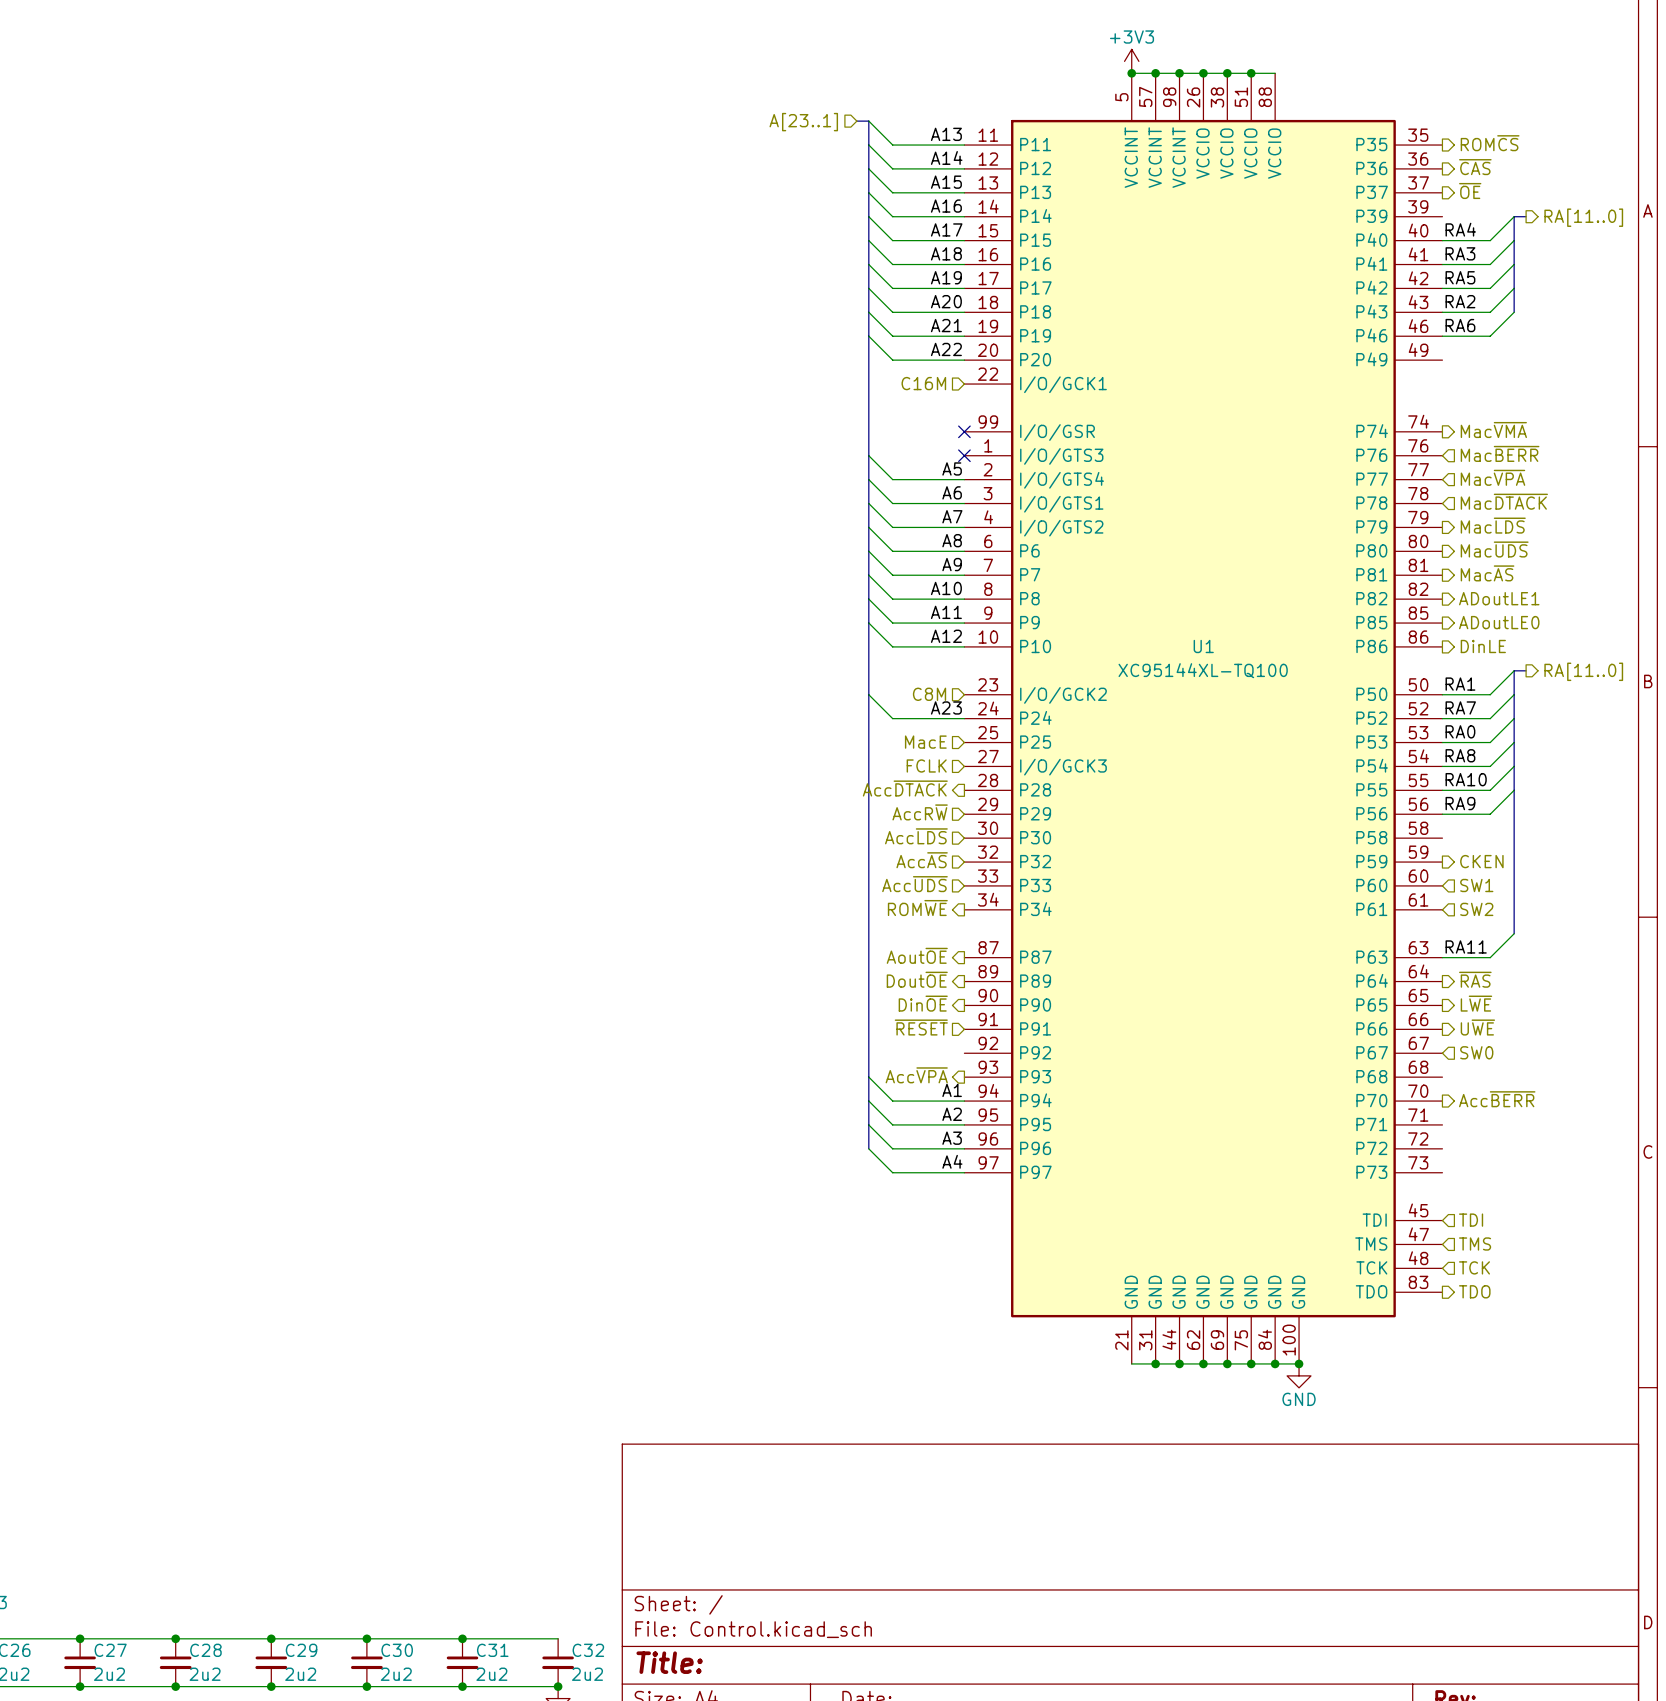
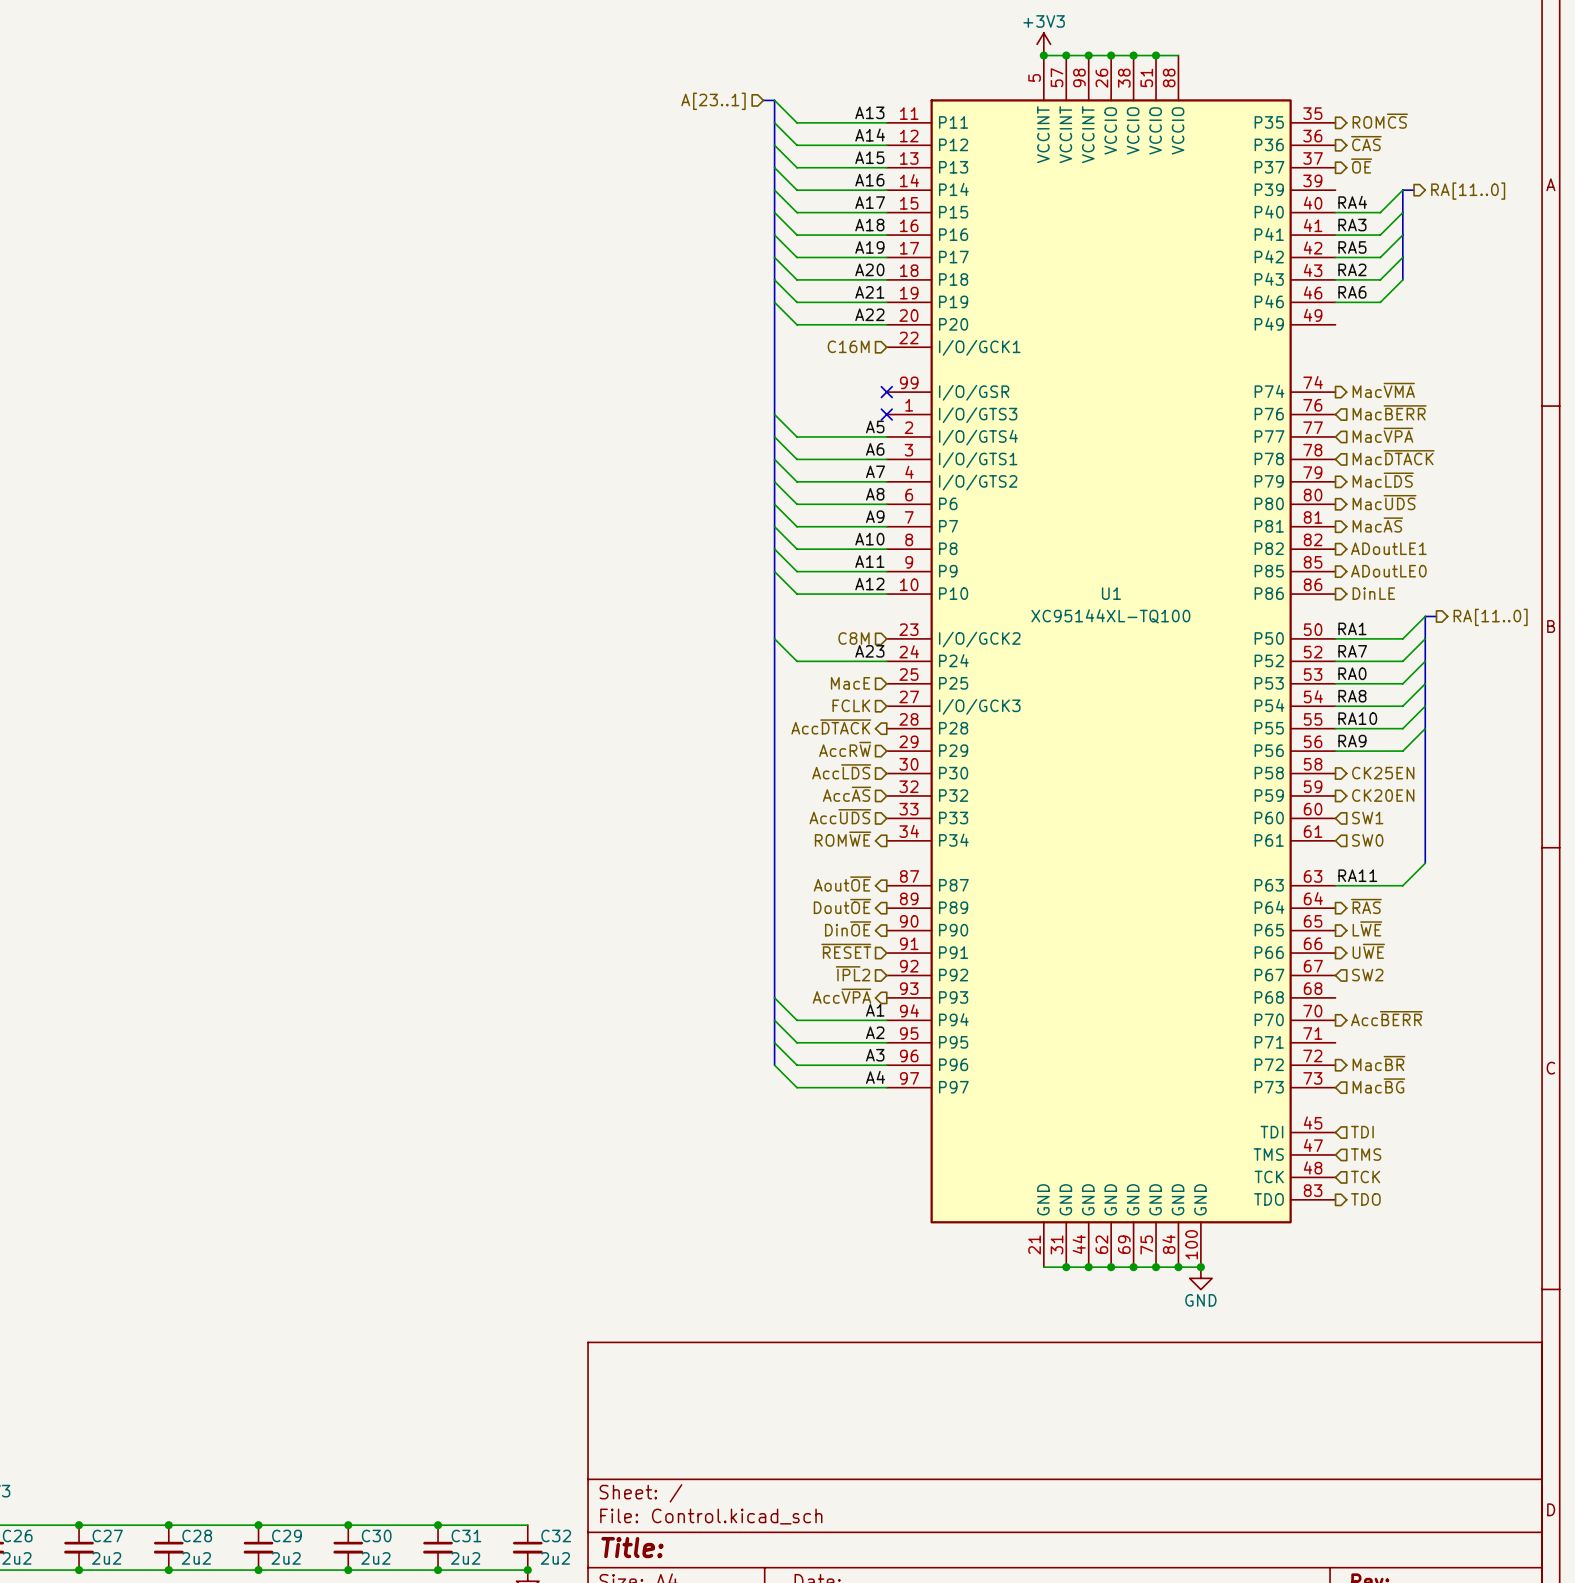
power symbol position: +3V3 (1131, 61) -> +3V3 (1043, 44)
junction: none -> (1043, 55)
wire: (1251, 73) (1275, 73) -> (1043, 55) (1066, 55)
junction: (1251, 73) -> none
bus: (856, 121) (868, 121) (868, 1148) -> (763, 100) (774, 100) (774, 1065)
wire: (868, 121) (892, 145) -> (774, 100) (797, 122) (841, 122)
hierarchical label position: A[23..1] (803, 122) -> A[23..1] (713, 101)
label position: A13 (946, 134) -> A13 (869, 112)
hierarchical label position: ROM~{CS} (1490, 143) -> ROM~{CS} (1380, 121)
wire: (868, 145) (892, 168) -> (774, 122) (797, 145) (841, 145)
label position: A14 (946, 157) -> A14 (870, 135)
hierarchical label position: ~{CAS} (1475, 167) -> ~{CAS} (1366, 143)
wire: (868, 168) (892, 192) -> (774, 145) (797, 167) (841, 167)
label position: A15 (946, 182) -> A15 (869, 157)
hierarchical label position: ~{OE} (1470, 191) -> ~{OE} (1361, 166)
wire: (868, 192) (892, 216) -> (774, 167) (797, 190) (841, 190)
label position: A16 (946, 206) -> A16 (869, 180)
wire: (868, 216) (892, 240) -> (774, 190) (797, 212) (841, 212)
wire: (1514, 216) (1490, 240) (1466, 240) -> (1402, 190) (1380, 212)
bus: (1526, 216) (1514, 216) (1514, 312) -> (1414, 190) (1402, 190) (1402, 279)
hierarchical label position: RA[11..0] (1583, 217) -> RA[11..0] (1468, 191)
label position: A17 (946, 229) -> A17 (870, 202)
label position: RA4 (1460, 229) -> RA4 (1352, 202)
wire: (868, 240) (892, 264) -> (774, 212) (797, 235) (841, 235)
wire: (1514, 240) (1490, 264) (1466, 264) -> (1402, 212) (1380, 235)
label position: A18 (946, 253) -> A18 (869, 225)
label position: RA3 (1460, 253) -> RA3 (1352, 225)
wire: (868, 264) (892, 288) -> (774, 235) (797, 257) (841, 257)
wire: (1514, 264) (1490, 288) (1466, 288) -> (1402, 235) (1380, 257)
label position: A19 (946, 277) -> A19 (869, 247)
label position: RA5 (1460, 277) -> RA5 (1352, 247)
wire: (868, 288) (892, 312) -> (774, 257) (797, 279) (841, 279)
wire: (1514, 288) (1490, 312) (1466, 312) -> (1402, 257) (1380, 279)
label position: A20 (946, 301) -> A20 (869, 269)
label position: RA2 (1460, 301) -> RA2 (1352, 269)
wire: (868, 312) (892, 336) -> (774, 279) (797, 302) (841, 302)
wire: (1514, 312) (1490, 336) (1466, 336) -> (1402, 279) (1380, 302)
label position: A21 (946, 325) -> A21 (869, 292)
label position: RA6 (1460, 325) -> RA6 (1352, 292)
wire: (868, 336) (892, 360) -> (774, 302) (797, 324) (841, 324)
label position: A22 (946, 349) -> A22 (869, 314)
hierarchical label position: C16M (923, 383) -> C16M (848, 346)
hierarchical label position: Mac~{VMA} (1493, 430) -> Mac~{VMA} (1383, 390)
no-connect mark: none -> (886, 392)
no-connect mark: (964, 431) -> none
hierarchical label position: Mac~{BERR} (1500, 453) -> Mac~{BERR} (1389, 412)
wire: (868, 455) (892, 479) -> (774, 414) (797, 436) (841, 436)
no-connect mark: none -> (886, 414)
no-connect mark: (964, 455) -> none
label position: A5 (952, 468) -> A5 (875, 426)
hierarchical label position: Mac~{VPA} (1492, 477) -> Mac~{VPA} (1382, 435)
wire: (868, 479) (892, 503) -> (774, 436) (797, 459) (841, 459)
label position: A6 (952, 492) -> A6 (875, 449)
hierarchical label position: Mac~{DTACK} (1504, 501) -> Mac~{DTACK} (1393, 457)
wire: (868, 503) (892, 527) -> (774, 459) (797, 481) (841, 481)
label position: A7 (952, 516) -> A7 (875, 471)
hierarchical label position: Mac~{LDS} (1493, 525) -> Mac~{LDS} (1383, 480)
wire: (868, 527) (892, 551) -> (774, 481) (797, 504) (841, 504)
label position: A8 (952, 540) -> A8 (875, 494)
hierarchical label position: Mac~{UDS} (1494, 549) -> Mac~{UDS} (1384, 502)
wire: (868, 551) (892, 575) -> (774, 504) (797, 526) (841, 526)
label position: A9 (952, 564) -> A9 (875, 516)
hierarchical label position: Mac~{AS} (1487, 573) -> Mac~{AS} (1377, 525)
wire: (868, 575) (892, 599) -> (774, 526) (797, 549) (841, 549)
label position: A10 (946, 588) -> A10 (869, 539)
hierarchical label position: ADoutLE1 (1499, 598) -> ADoutLE1 (1388, 548)
wire: (868, 599) (892, 623) -> (774, 549) (797, 571) (841, 571)
label position: A11 (946, 612) -> A11 (869, 561)
hierarchical label position: ADoutLE0 (1499, 622) -> ADoutLE0 (1388, 571)
wire: (868, 623) (892, 646) -> (774, 571) (797, 594) (841, 594)
label position: A12 (946, 636) -> A12 (869, 584)
hierarchical label position: DinLE (1483, 646) -> DinLE (1373, 593)
label position: RA1 (1460, 684) -> RA1 (1352, 628)
wire: (868, 694) (892, 718) -> (774, 638) (797, 661) (841, 661)
hierarchical label position: C8M (929, 694) -> C8M (854, 638)
label position: A23 (946, 707) -> A23 (869, 651)
label position: RA7 (1460, 707) -> RA7 (1352, 651)
U1 position: (1203, 718) -> (1111, 661)
label position: RA0 (1460, 731) -> RA0 (1352, 673)
hierarchical label position: MacE (925, 742) -> MacE (850, 683)
label position: RA8 (1460, 755) -> RA8 (1352, 696)
hierarchical label position: FCLK (926, 765) -> FCLK (851, 705)
label position: RA10 (1466, 779) -> RA10 (1357, 718)
hierarchical label position: Acc~{DTACK} (905, 788) -> Acc~{DTACK} (831, 726)
label position: RA9 (1460, 803) -> RA9 (1352, 741)
hierarchical label position: AccR~{W} (920, 812) -> AccR~{W} (845, 749)
hierarchical label position: Acc~{LDS} (916, 836) -> Acc~{LDS} (841, 771)
hierarchical label: none -> CK25EN (1383, 773)
hierarchical label position: Acc~{AS} (922, 860) -> Acc~{AS} (847, 794)
hierarchical label: none -> CK20EN (1383, 795)
hierarchical label: CKEN (1481, 861) -> none
hierarchical label position: Acc~{UDS} (914, 884) -> Acc~{UDS} (840, 816)
hierarchical label position: SW1 (1476, 885) -> SW1 (1367, 817)
hierarchical label position: ROM~{WE} (917, 908) -> ROM~{WE} (843, 839)
hierarchical label position: SW2 (1476, 909) -> SW2 (1367, 975)
label position: RA11 (1466, 946) -> RA11 (1357, 875)
hierarchical label position: Aout~{OE} (917, 955) -> Aout~{OE} (842, 884)
hierarchical label position: Dout~{OE} (917, 979) -> Dout~{OE} (842, 906)
hierarchical label position: ~{RAS} (1475, 979) -> ~{RAS} (1366, 906)
hierarchical label position: Din~{OE} (923, 1003) -> Din~{OE} (848, 928)
hierarchical label position: L~{WE} (1476, 1003) -> L~{WE} (1367, 928)
hierarchical label position: ~{RESET} (921, 1027) -> ~{RESET} (846, 951)
hierarchical label position: U~{WE} (1477, 1027) -> U~{WE} (1368, 951)
hierarchical label: none -> ~{IPL}2 (852, 973)
hierarchical label position: SW0 (1476, 1052) -> SW0 (1367, 840)
hierarchical label position: Acc~{VPA} (916, 1075) -> Acc~{VPA} (841, 996)
wire: (868, 1077) (892, 1101) -> (774, 997) (797, 1020) (841, 1020)
label position: A1 (952, 1090) -> A1 (875, 1010)
hierarchical label position: Acc~{BERR} (1497, 1099) -> Acc~{BERR} (1386, 1018)
wire: (868, 1101) (892, 1124) -> (774, 1020) (797, 1042) (841, 1042)
label position: A2 (952, 1114) -> A2 (875, 1032)
wire: (868, 1124) (892, 1148) -> (774, 1042) (797, 1065) (841, 1065)
label position: A3 (952, 1138) -> A3 (875, 1055)
hierarchical label: none -> Mac~{BR} (1378, 1063)
wire: (868, 1148) (892, 1172) -> (774, 1065) (797, 1087) (841, 1087)
label position: A4 (952, 1161) -> A4 (875, 1077)
hierarchical label: none -> Mac~{BG} (1378, 1085)
hierarchical label position: TDI (1471, 1220) -> TDI (1362, 1132)
hierarchical label position: TMS (1475, 1244) -> TMS (1366, 1154)
hierarchical label position: TCK (1474, 1267) -> TCK (1365, 1176)
hierarchical label position: TDO (1474, 1291) -> TDO (1365, 1199)
junction: none -> (1066, 1267)
wire: (1275, 1363) (1299, 1363) -> (1043, 1267) (1066, 1267)
junction: (1299, 1363) -> none
power symbol position: GND (1299, 1375) -> GND (1200, 1278)

